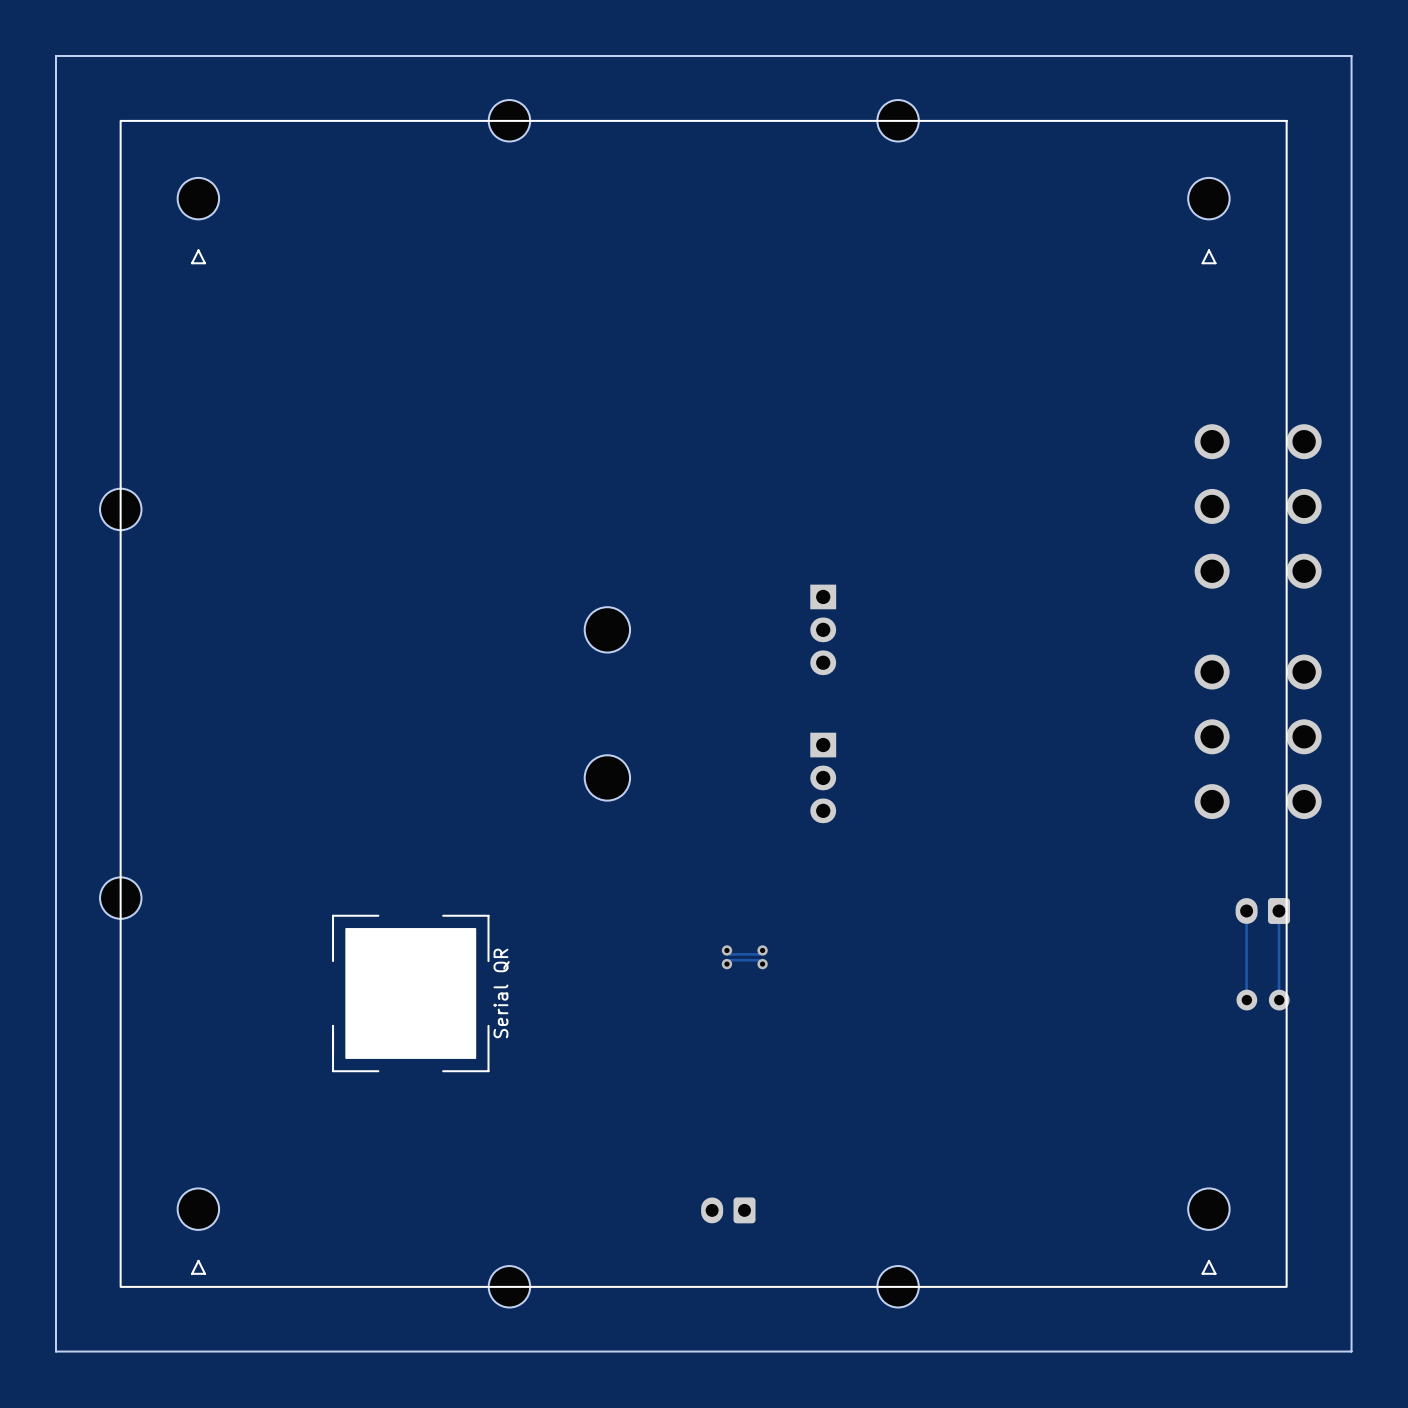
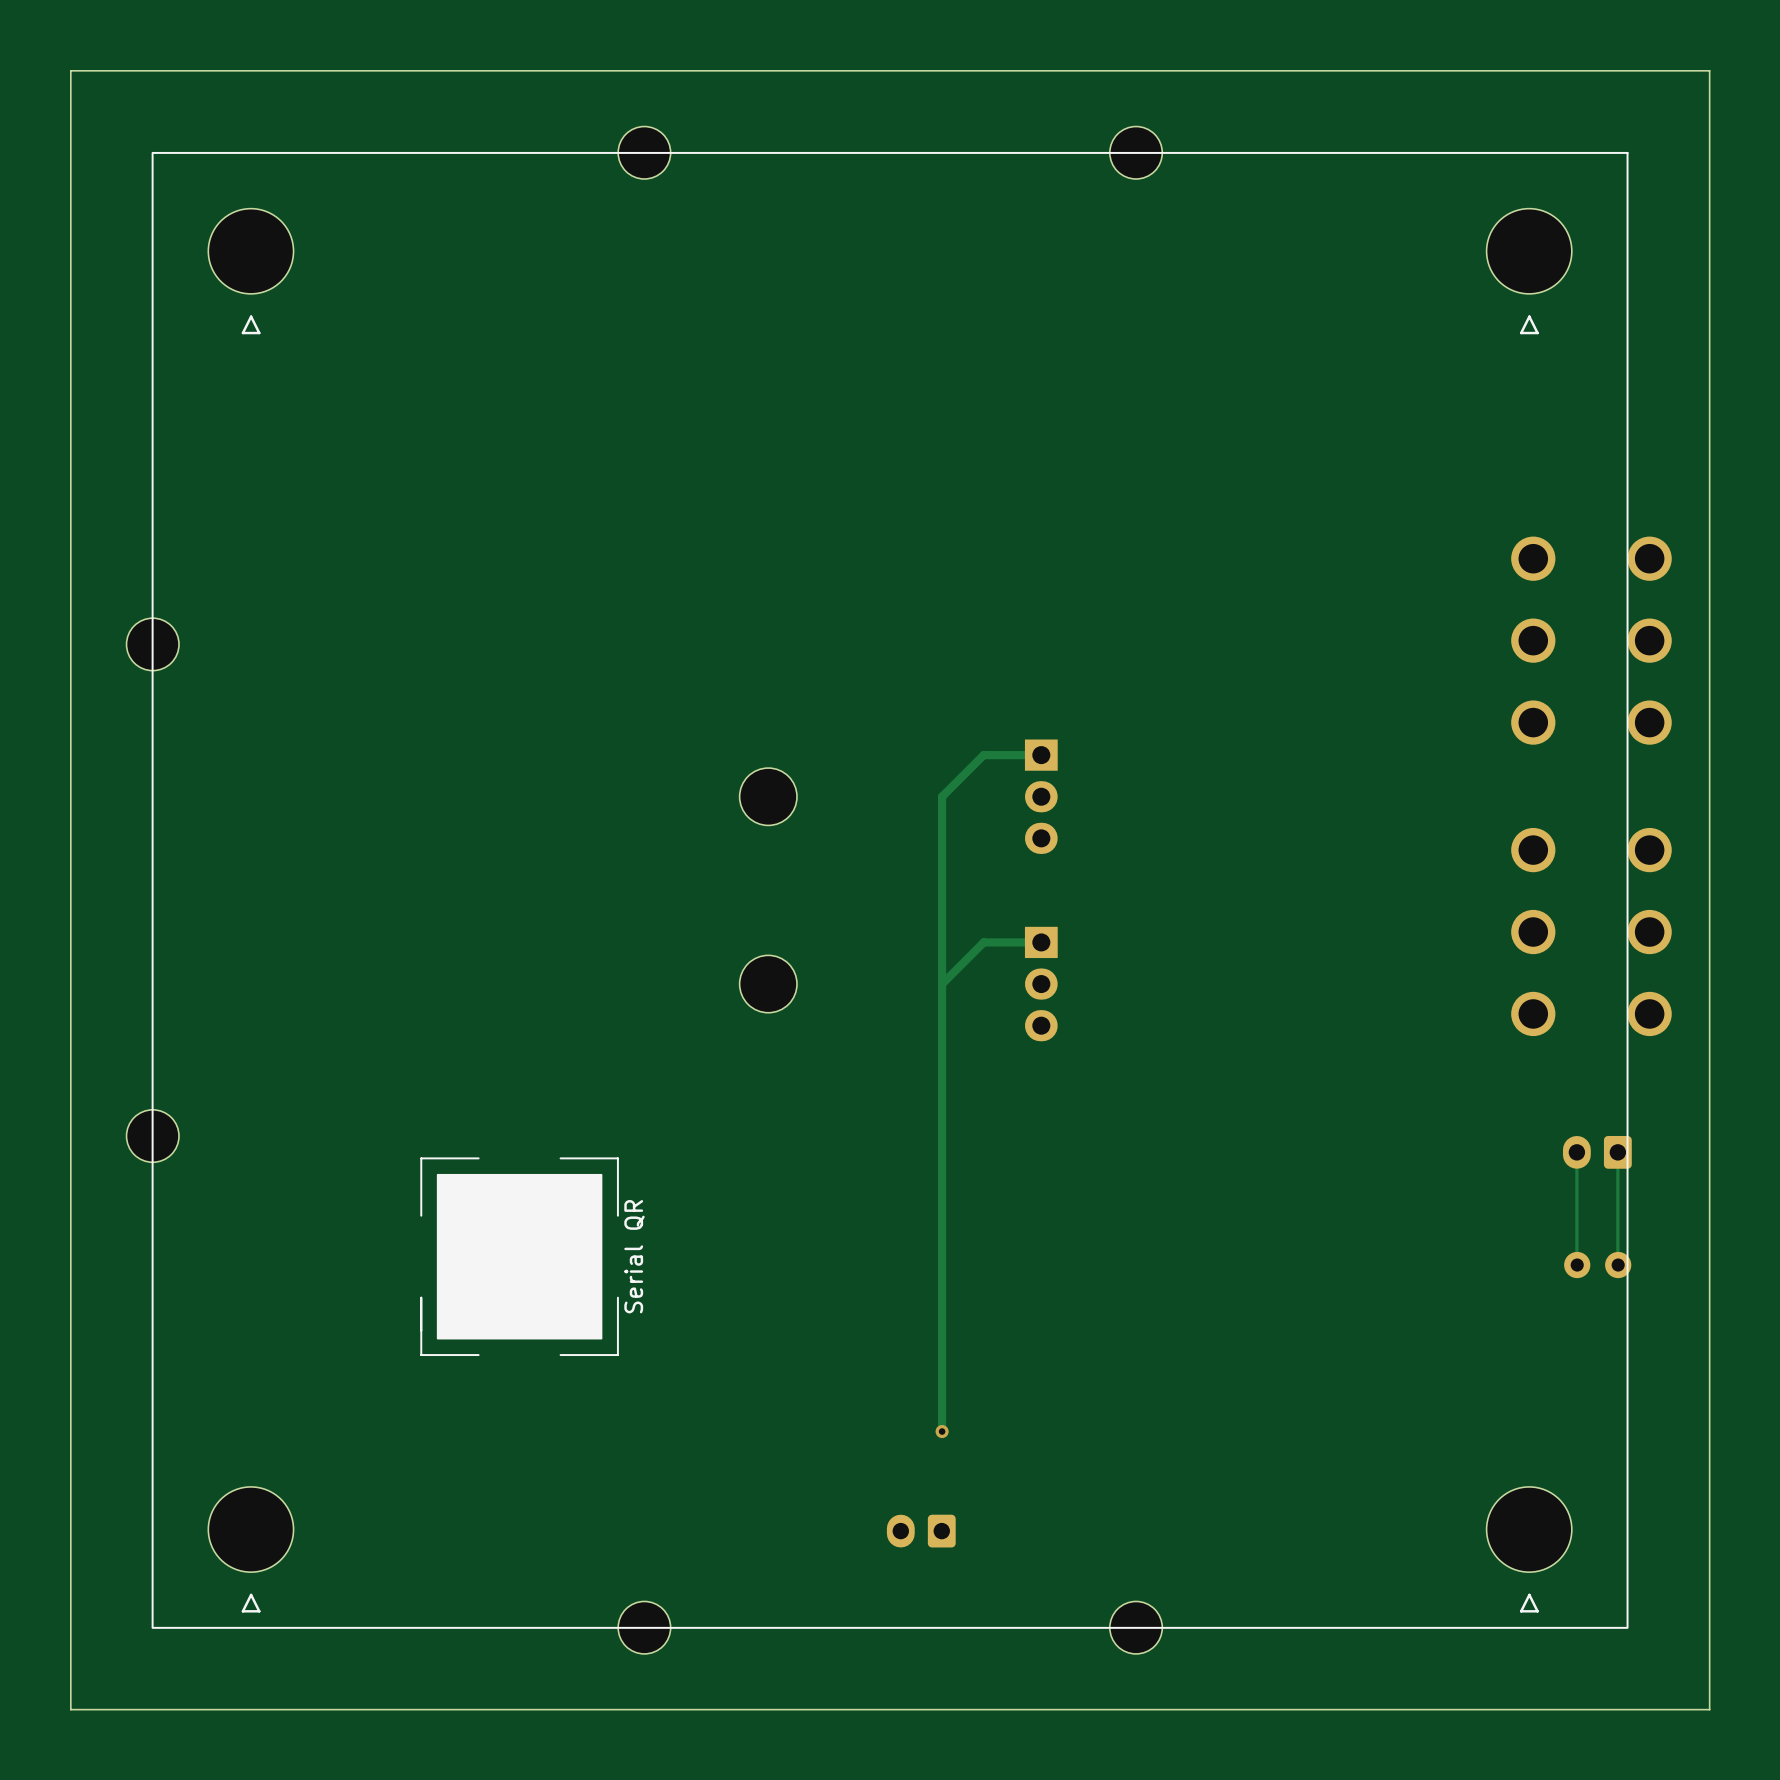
part footprint: [119, 120, 1288, 1288] -> [151, 151, 1629, 1629]
track: none -> (1041, 755) (983, 755) (942, 796) (942, 1431)
track: none -> (1041, 942) (983, 942) (942, 984)
via: (726, 950) -> none
track: (762, 950) (758, 954) (730, 954) (726, 950) -> none
via: (762, 950) -> none
via: (726, 964) -> none
track: (762, 964) (758, 960) (730, 960) (726, 964) -> none
via: (762, 964) -> none
via: none -> (942, 1431)

